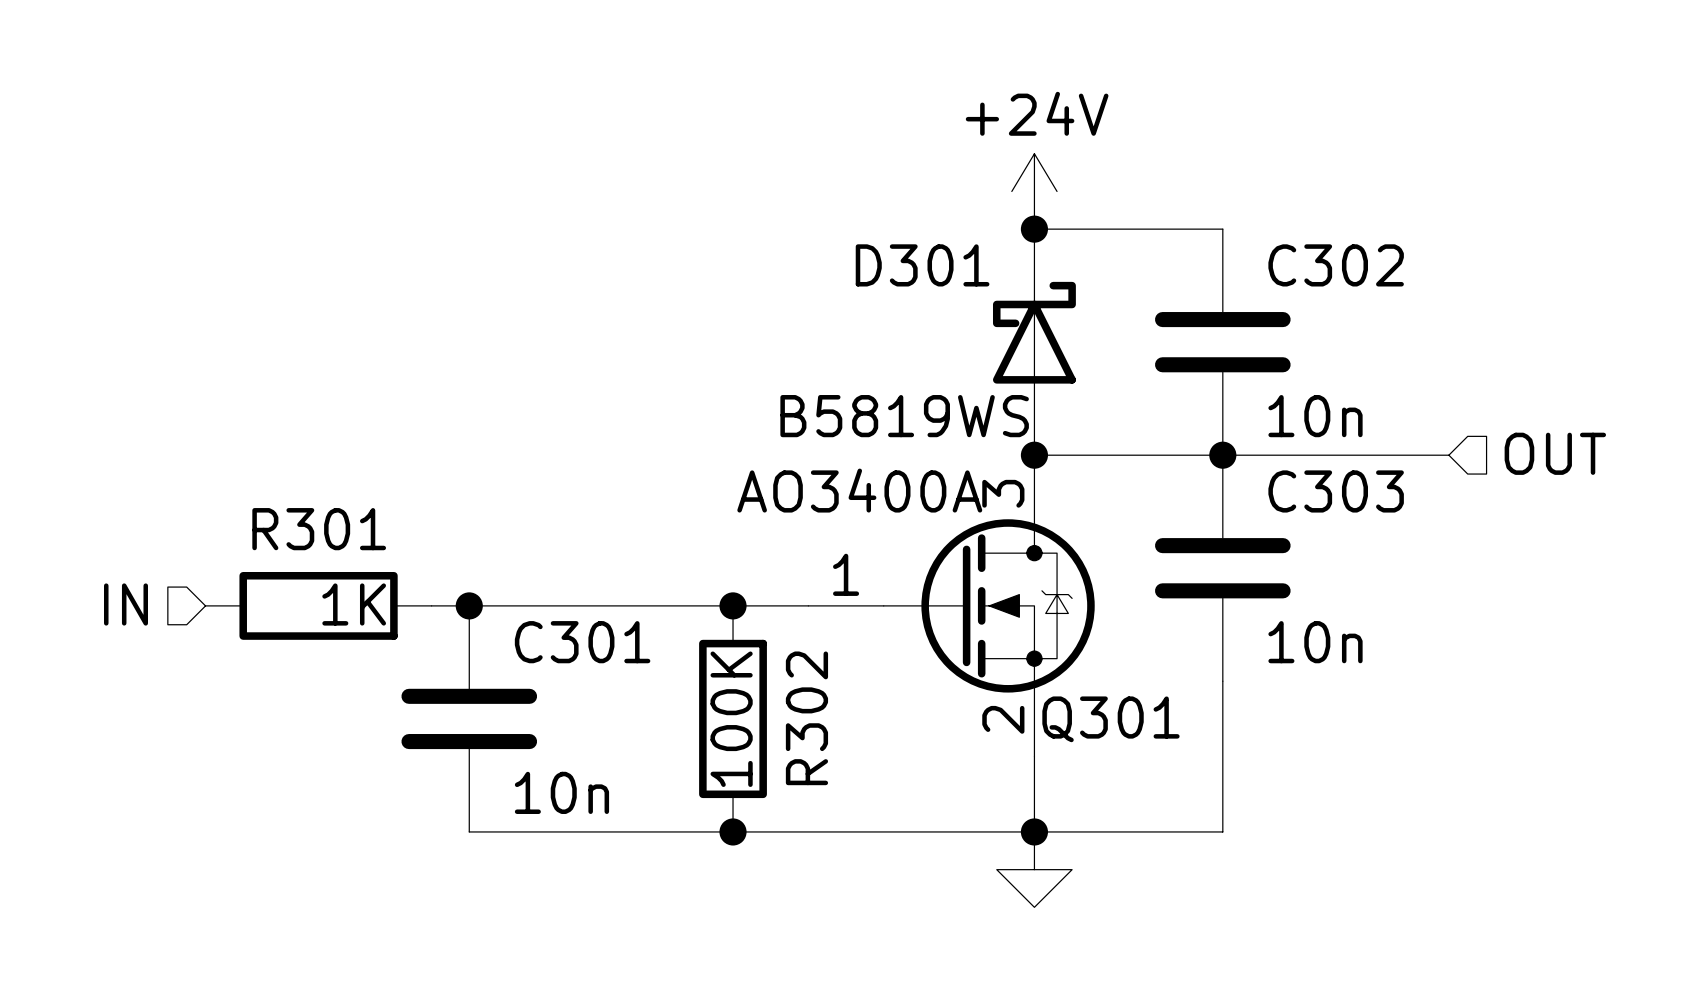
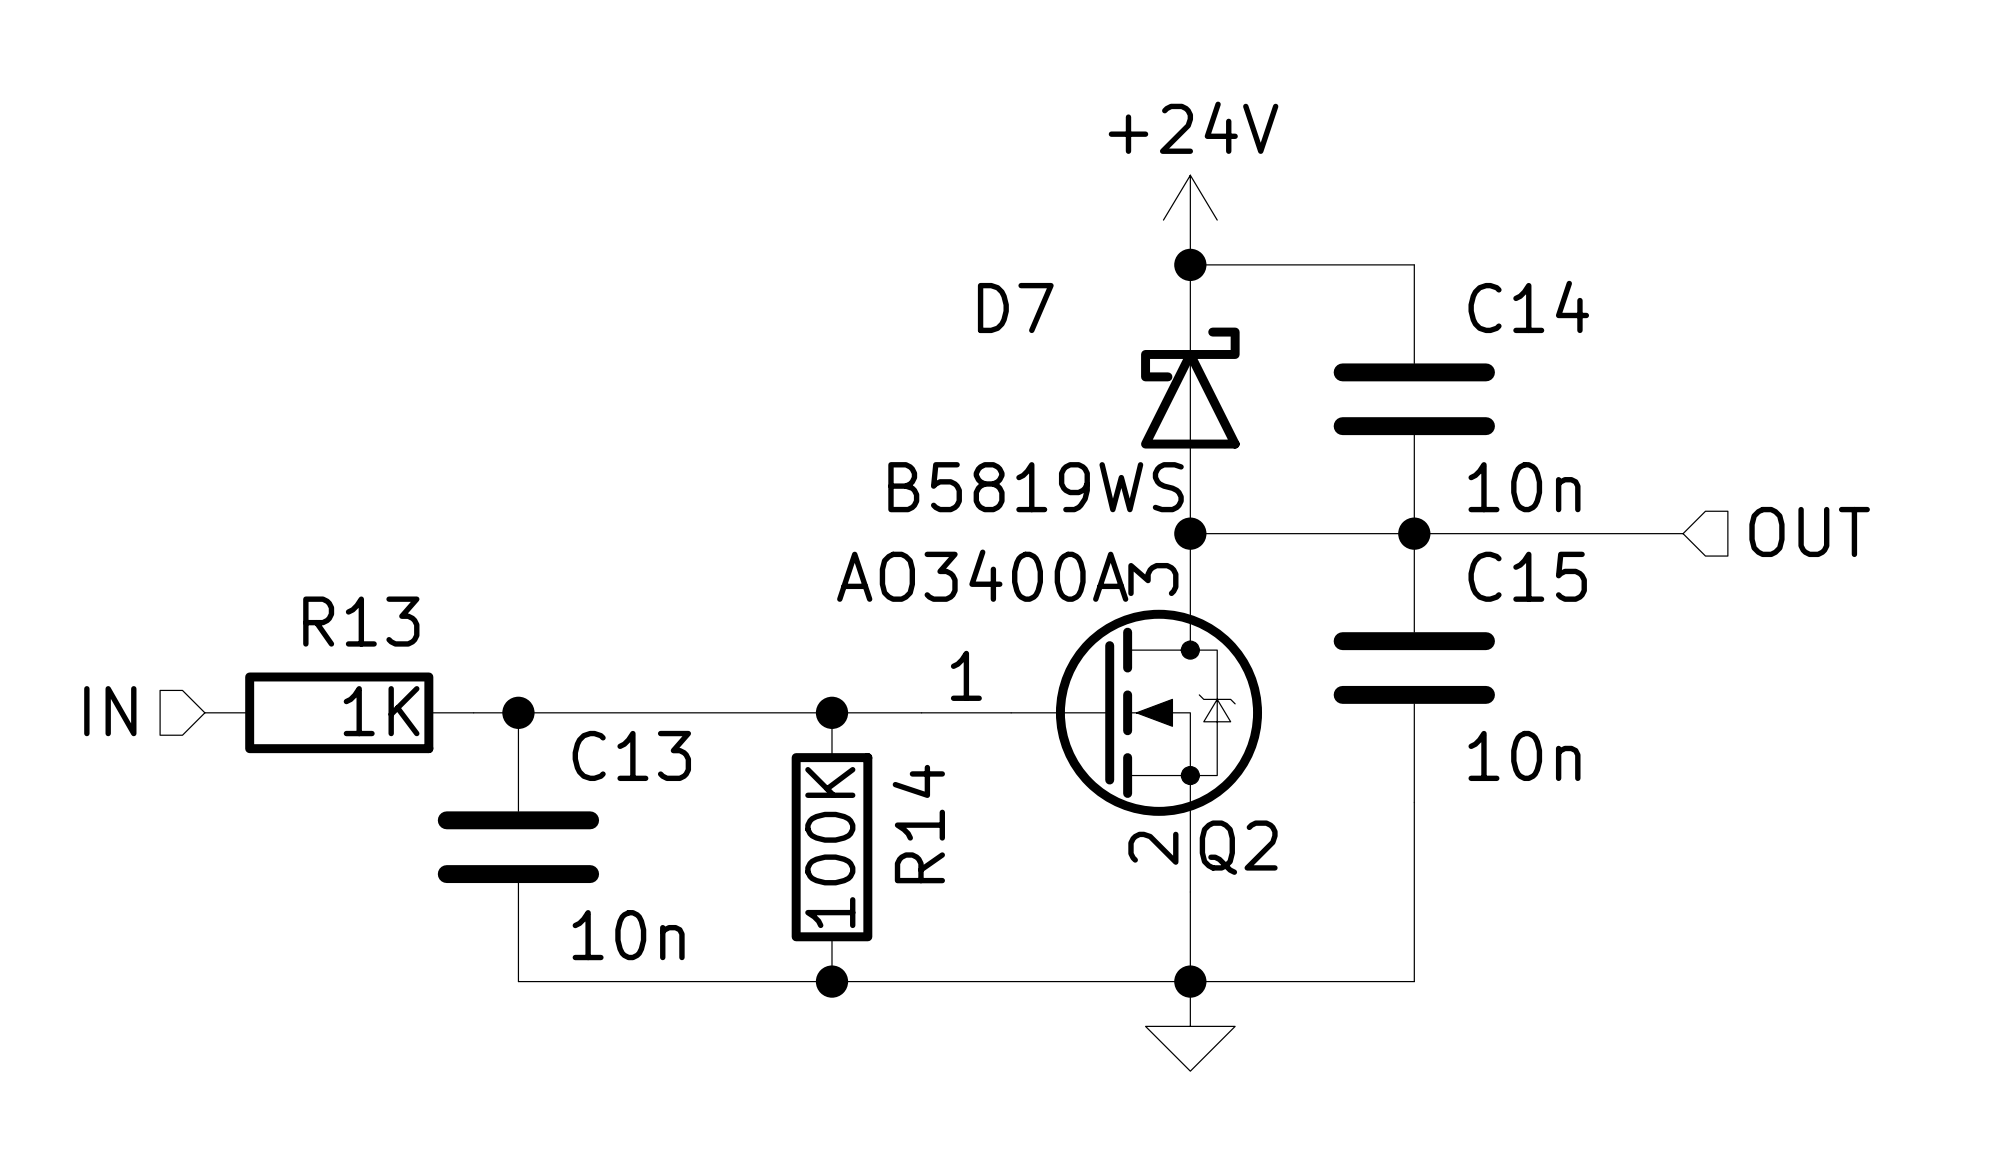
D301 name: D301 (922, 265) -> D7 (1015, 308)
C302 name: C302 (1336, 265) -> C14 (1528, 306)
C303 name: C303 (1336, 491) -> C15 (1527, 576)
R301 name: R301 (319, 529) -> R13 (361, 621)
C301 name: C301 (582, 642) -> C13 (631, 755)
R302 name: R302 (806, 718) -> R14 (918, 824)
Q301 name: Q301 (1110, 719) -> Q2 (1238, 847)

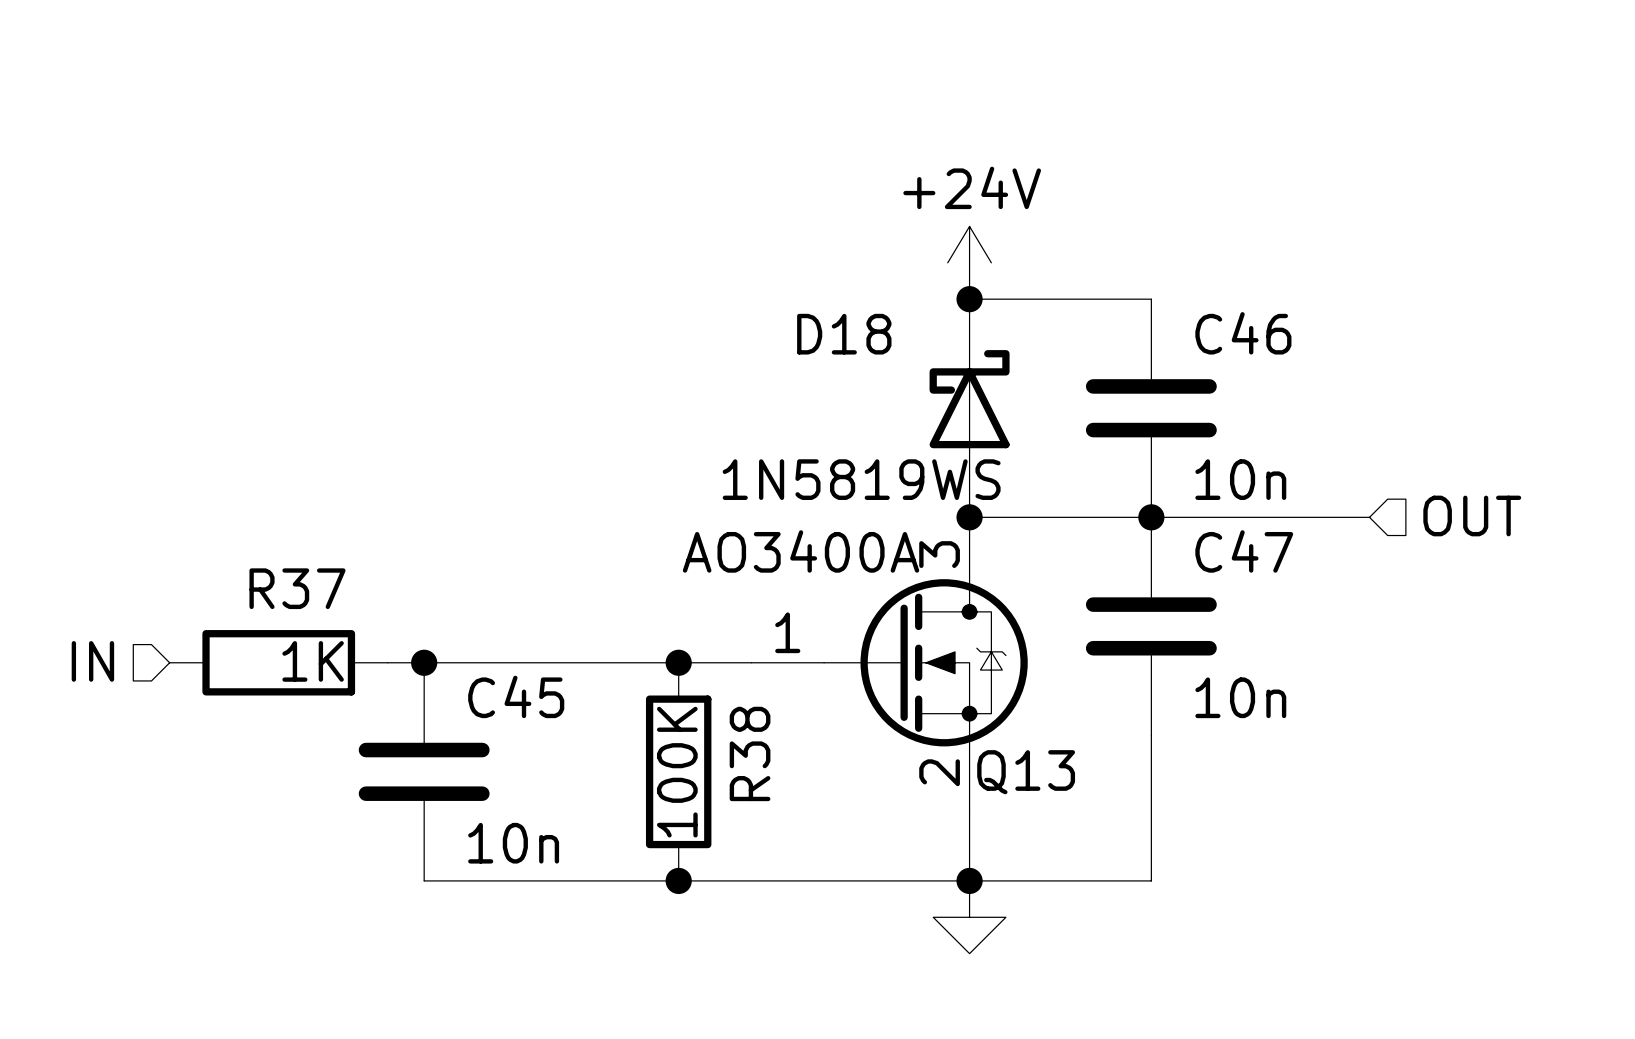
C14 name: C14 (1528, 306) -> C46 (1243, 333)
D7 name: D7 (1015, 308) -> D18 (844, 334)
D7 value: B5819WS (1036, 487) -> 1N5819WS (861, 479)
C15 name: C15 (1527, 576) -> C47 (1244, 551)
R13 name: R13 (361, 621) -> R37 (297, 588)
C13 name: C13 (631, 755) -> C45 (516, 696)
R14 name: R14 (918, 824) -> R38 (750, 753)
Q2 name: Q2 (1238, 847) -> Q13 (1026, 772)

